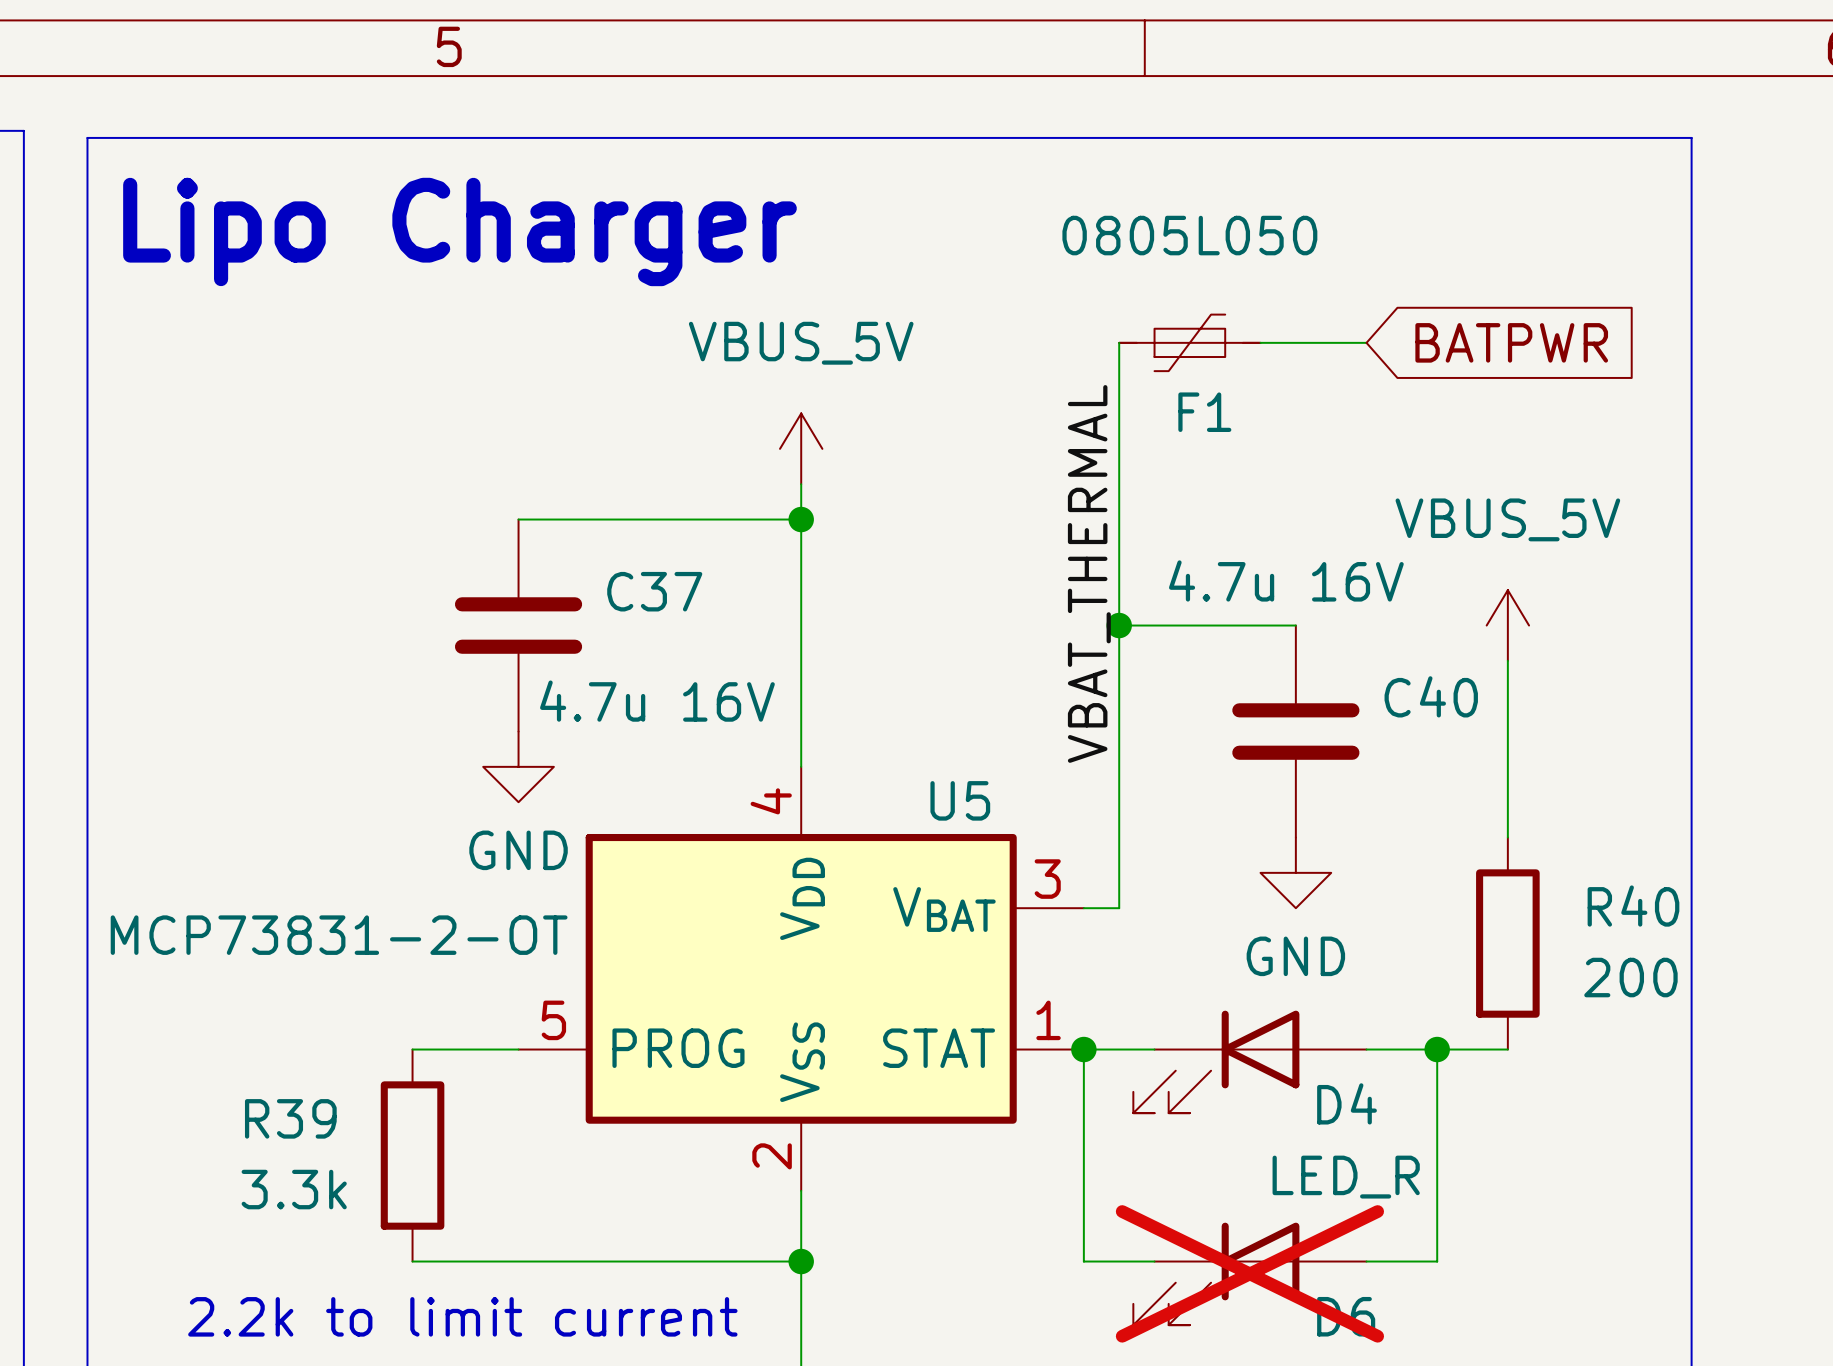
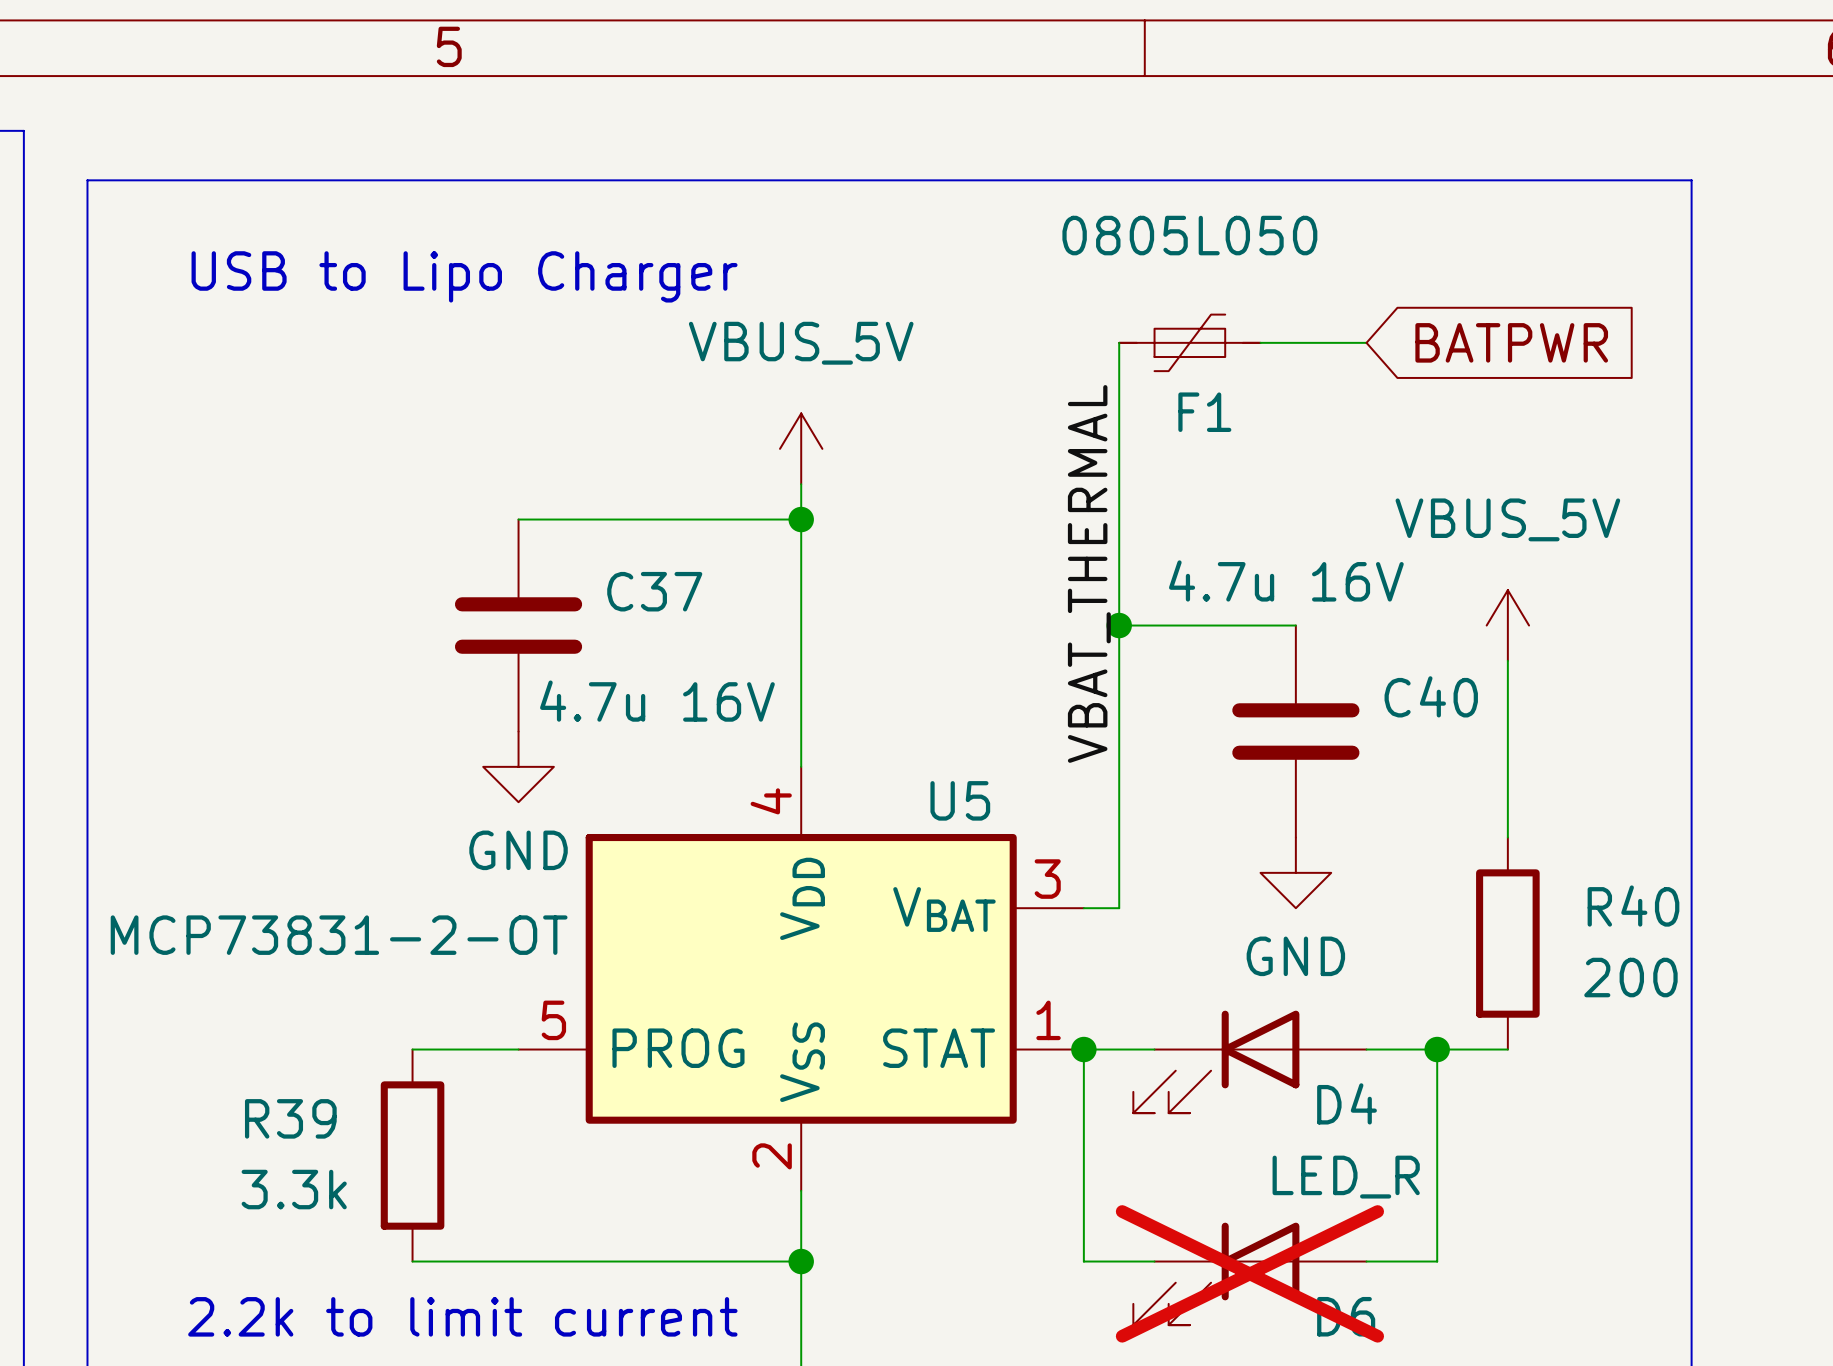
line: (87, 180) (87, 137) (1691, 137) (1691, 180) -> (87, 180) (1691, 180)
text: Lipo Charger (459, 231) -> USB to Lipo Charger (464, 276)

